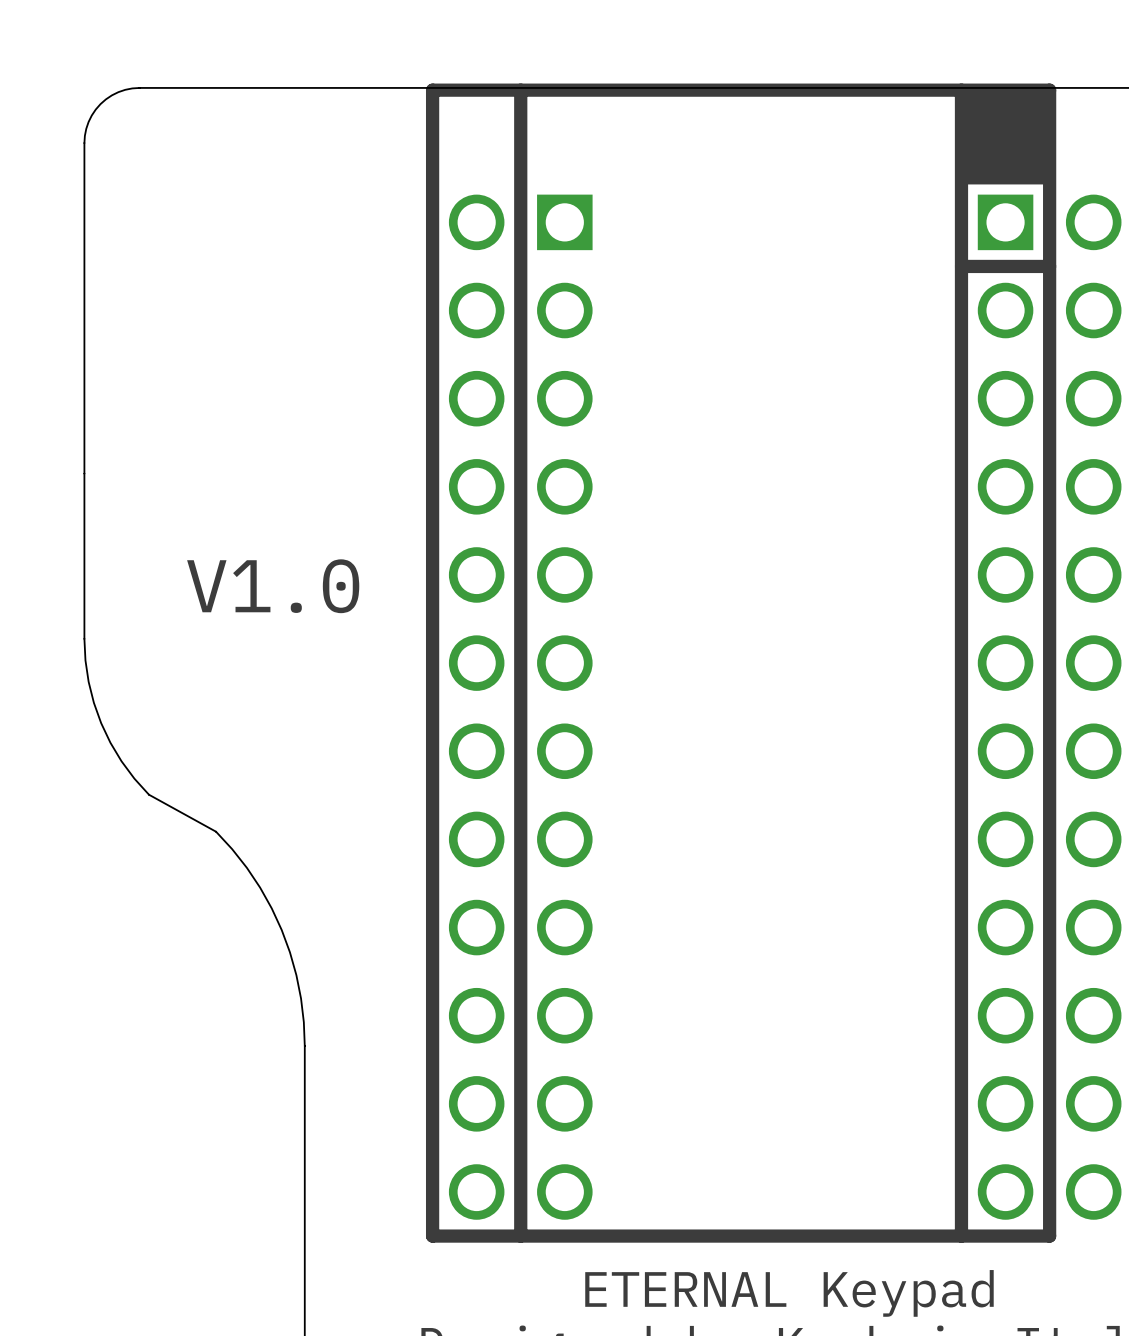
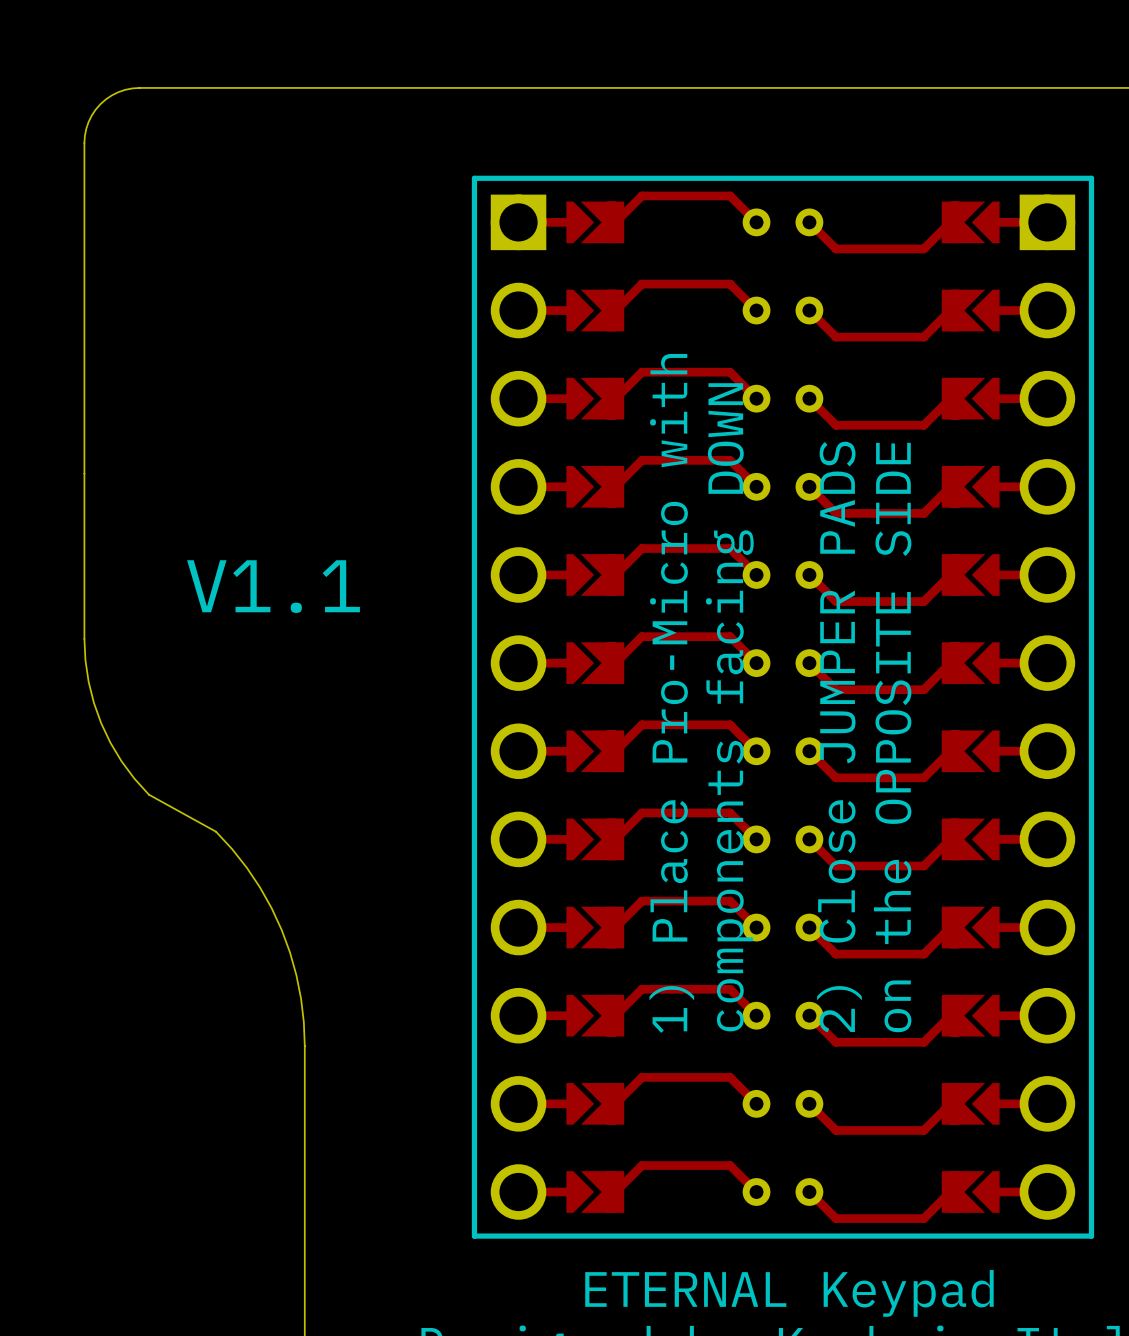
text: V1.0 (273, 586) -> V1.1 (273, 586)
part: (773, 663) -> none
text: none -> 1) Place Pro-Micro with (671, 693)
text: none -> components facing DOWN (729, 707)
part: none -> (782, 707)
text: none -> 2) Close JUMPER PADS (839, 737)
text: none -> on the OPPOSITE SIDE (892, 737)

